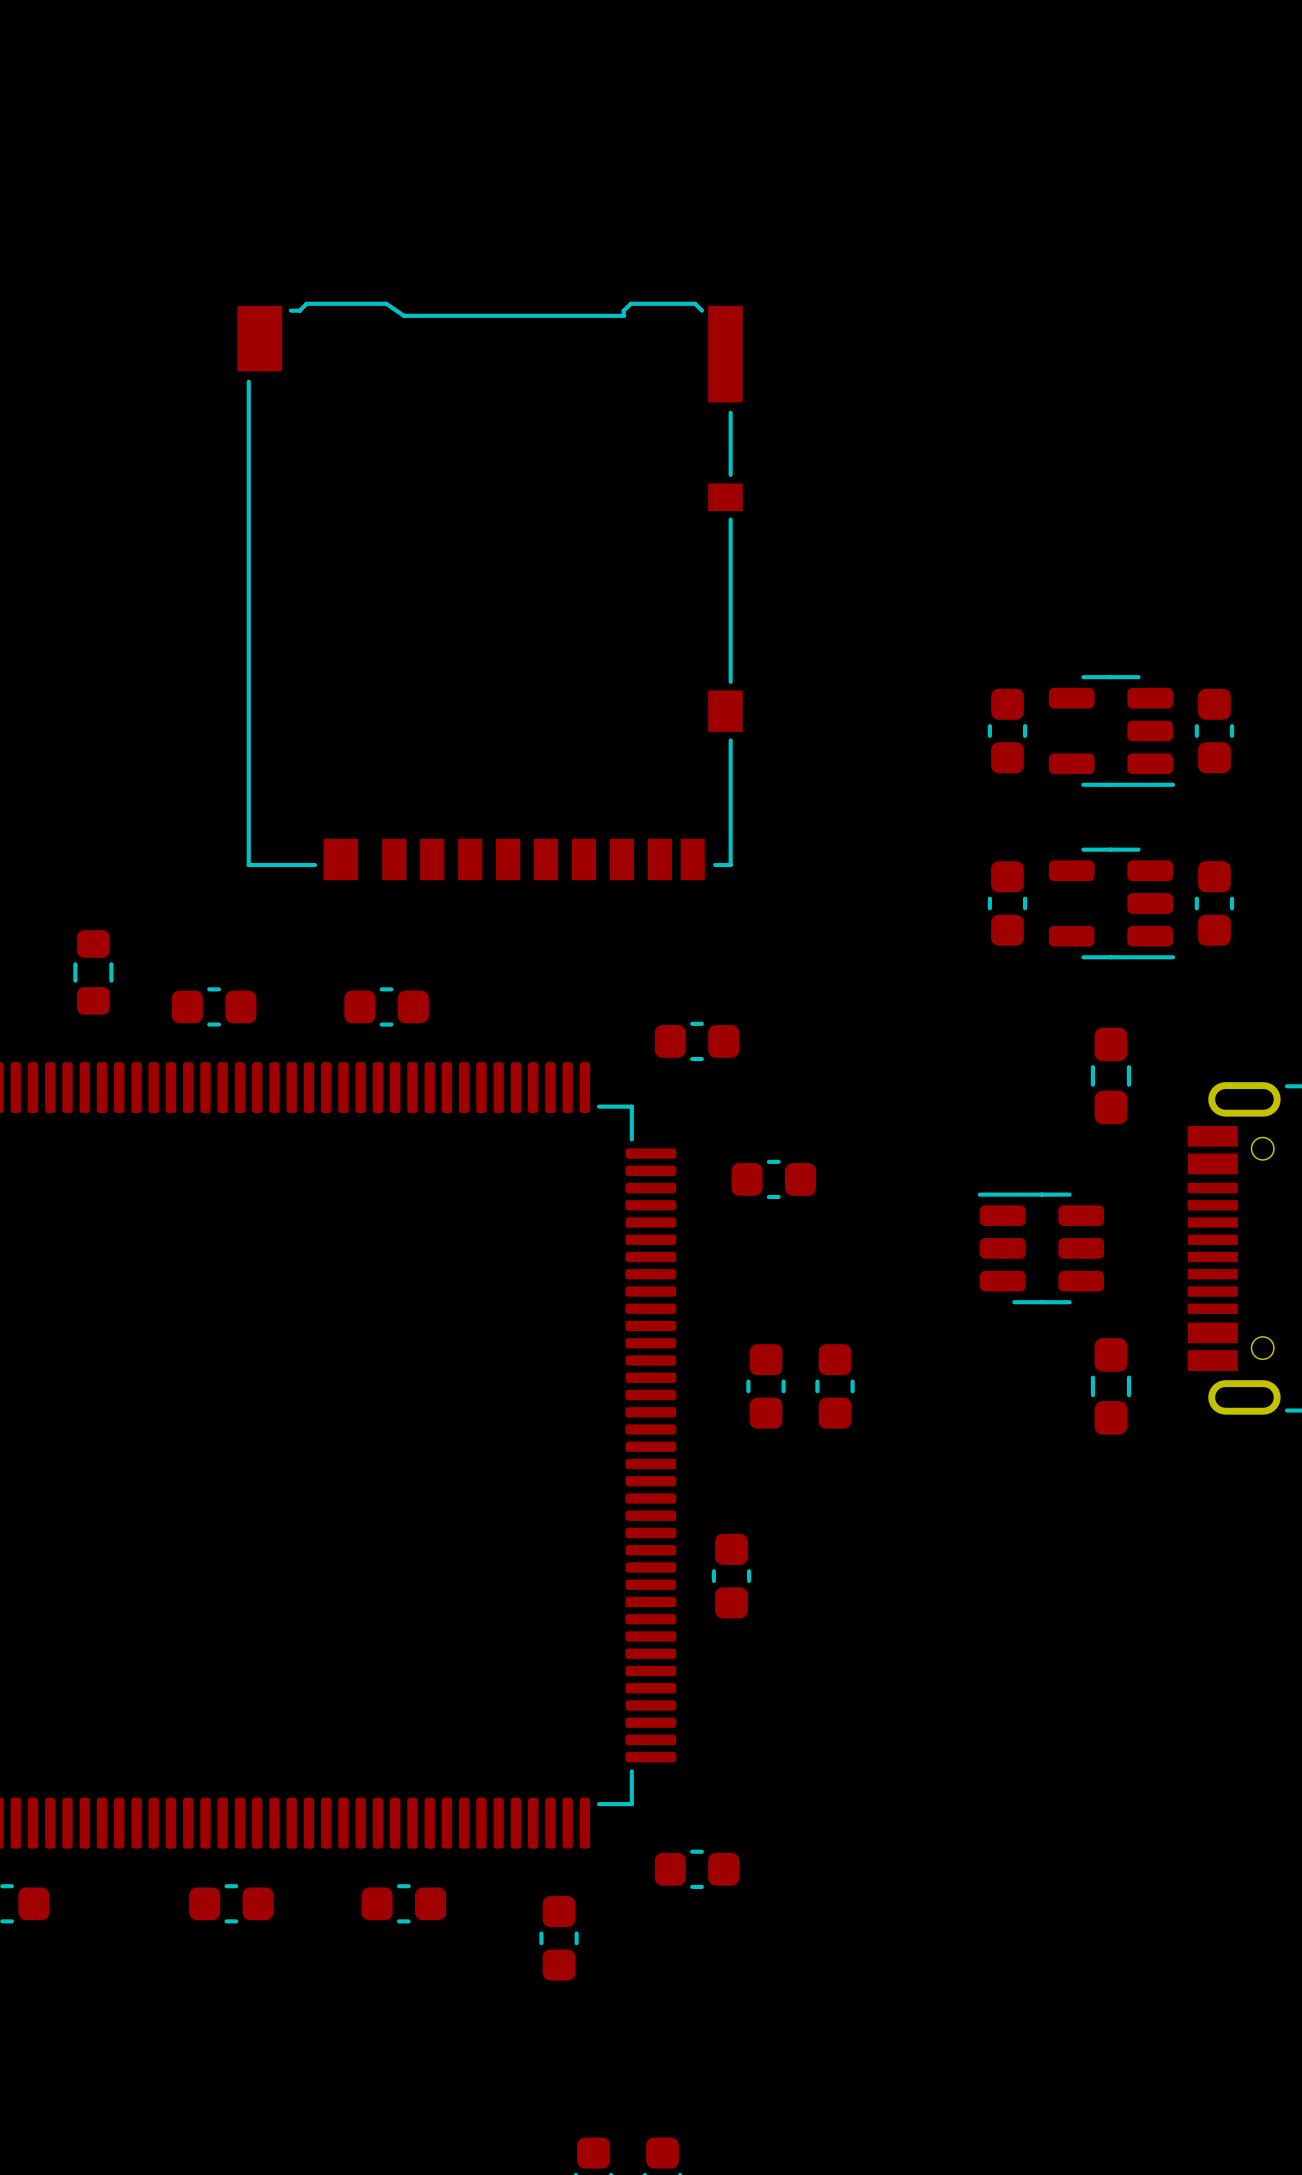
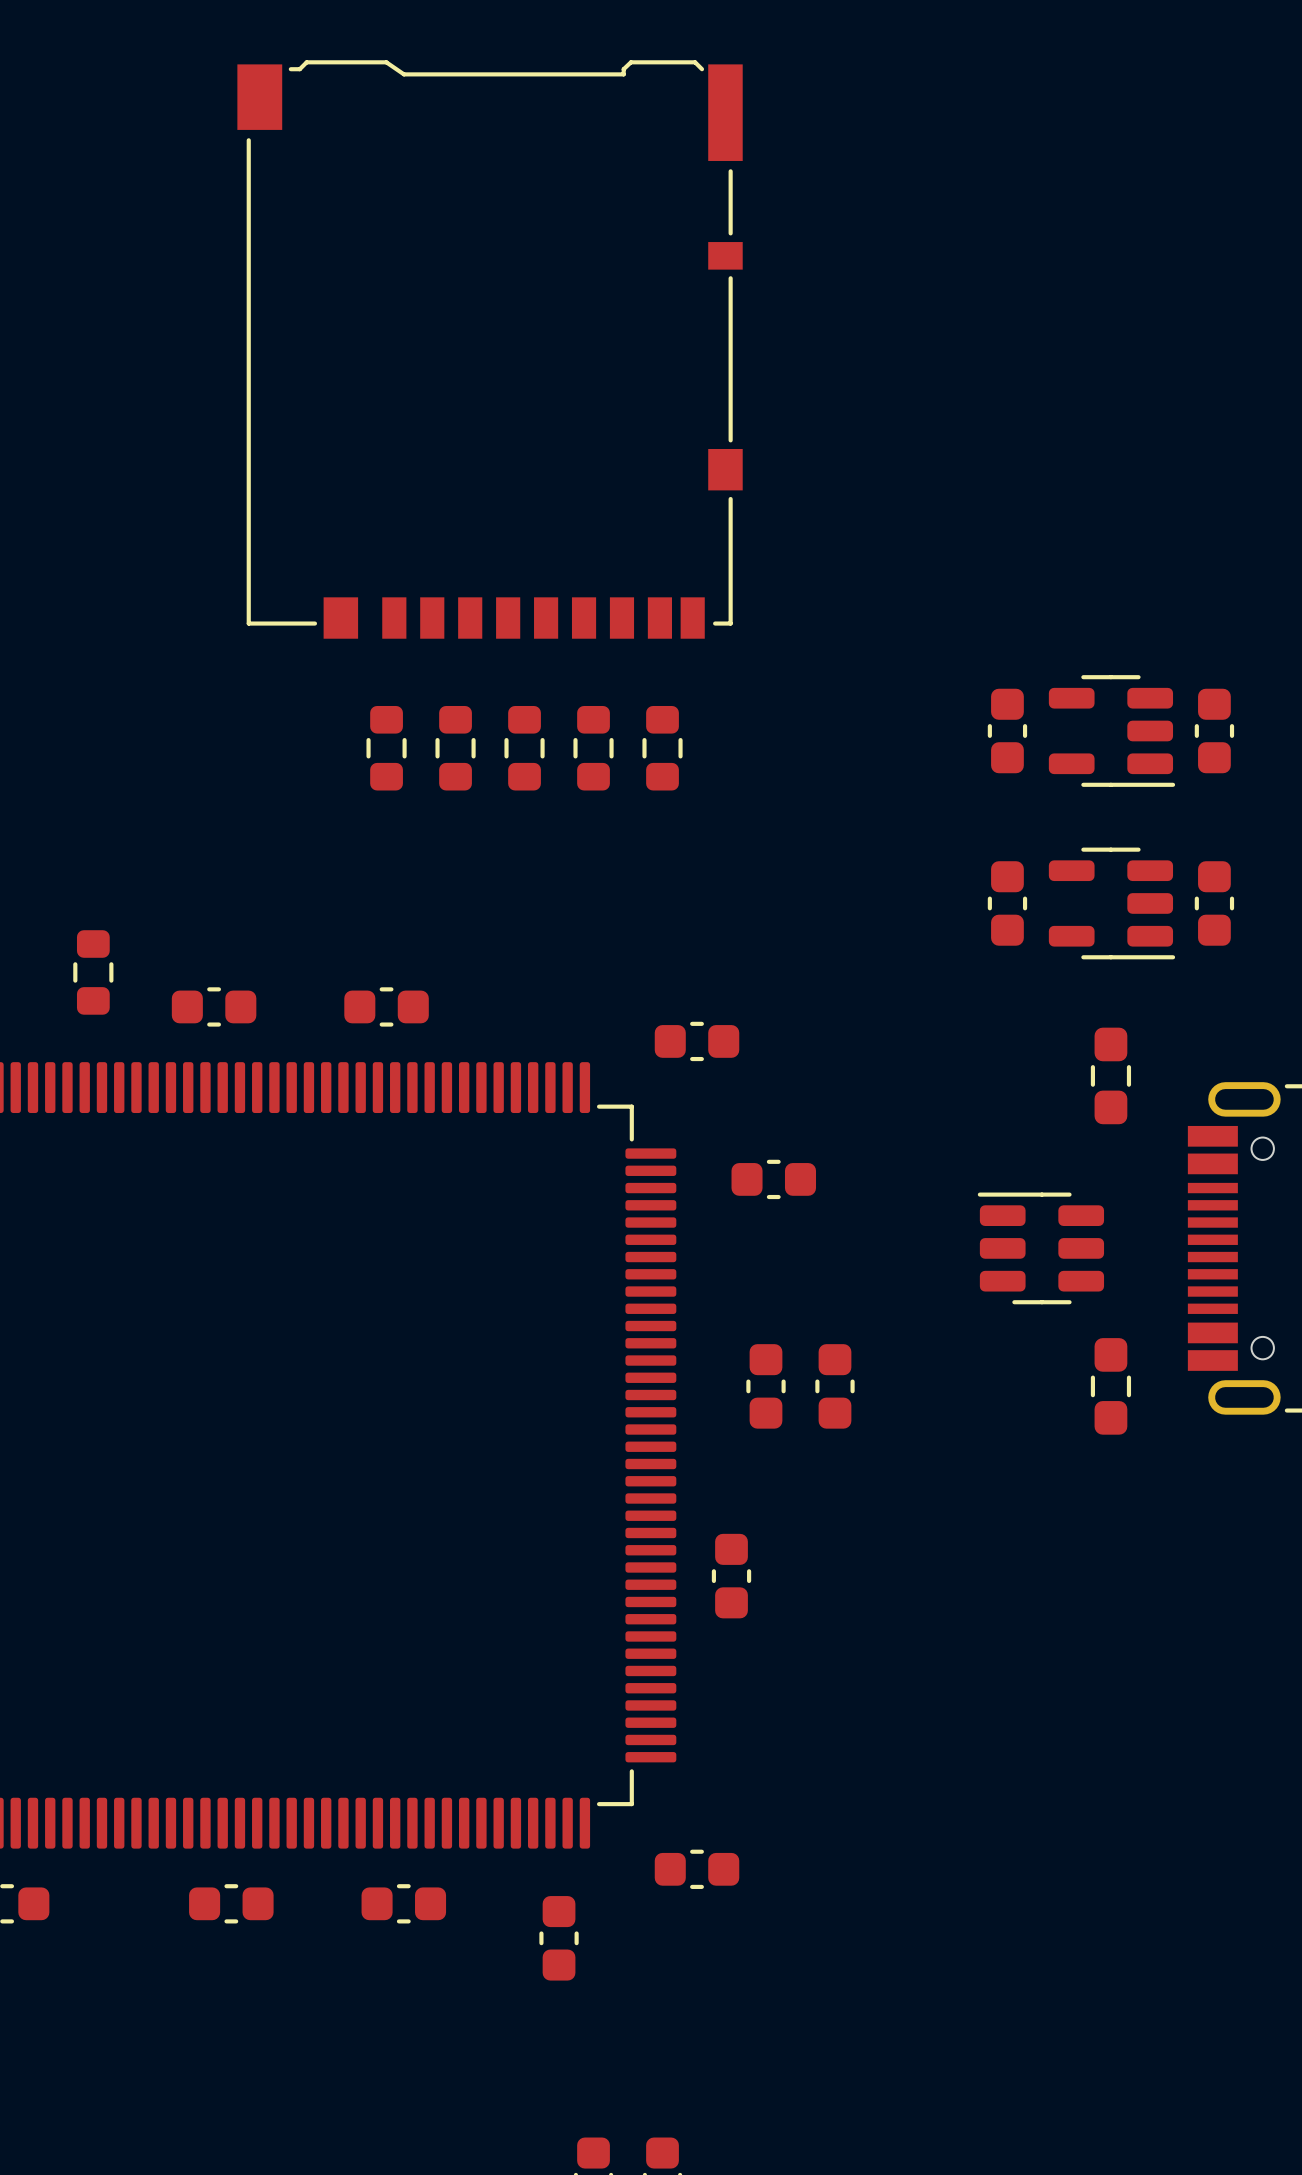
part position: (490, 590) -> (490, 349)
part: none -> (386, 748)
part: none -> (455, 748)
part: none -> (524, 748)
part: none -> (593, 748)
part: none -> (662, 748)

